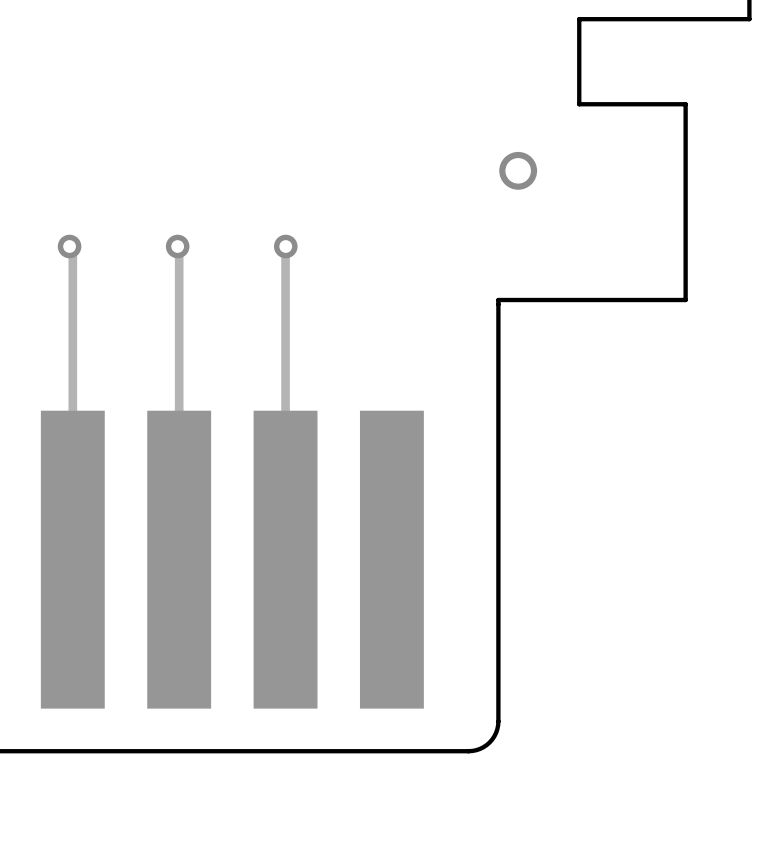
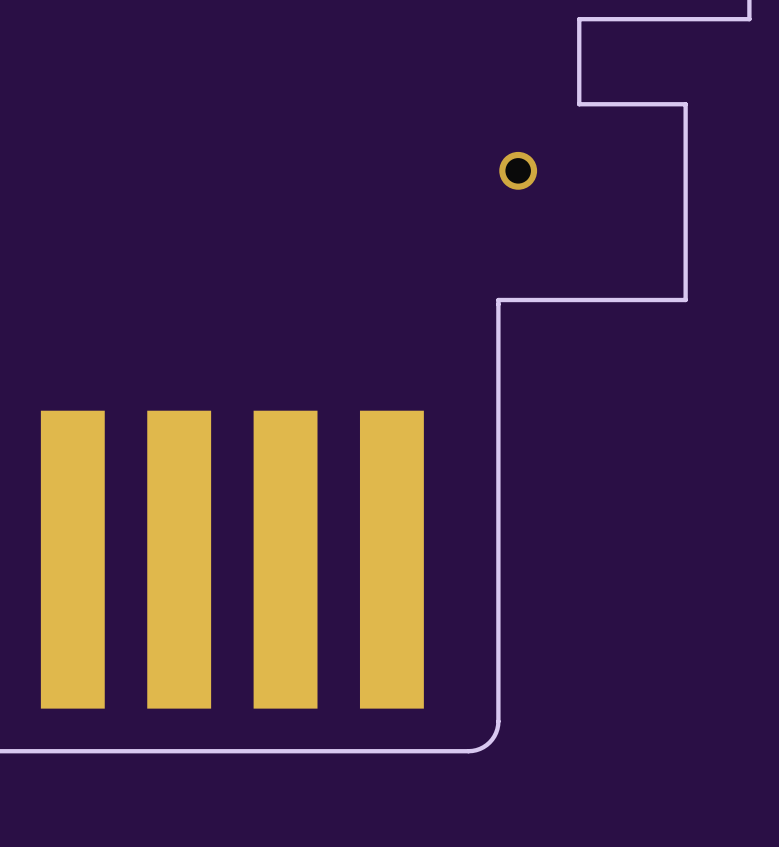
track: (69, 246) (72, 249) (72, 559) -> none
via: (69, 246) -> none
track: (177, 246) (179, 248) (179, 559) -> none
via: (177, 246) -> none
track: (285, 246) (285, 559) -> none
via: (285, 246) -> none

